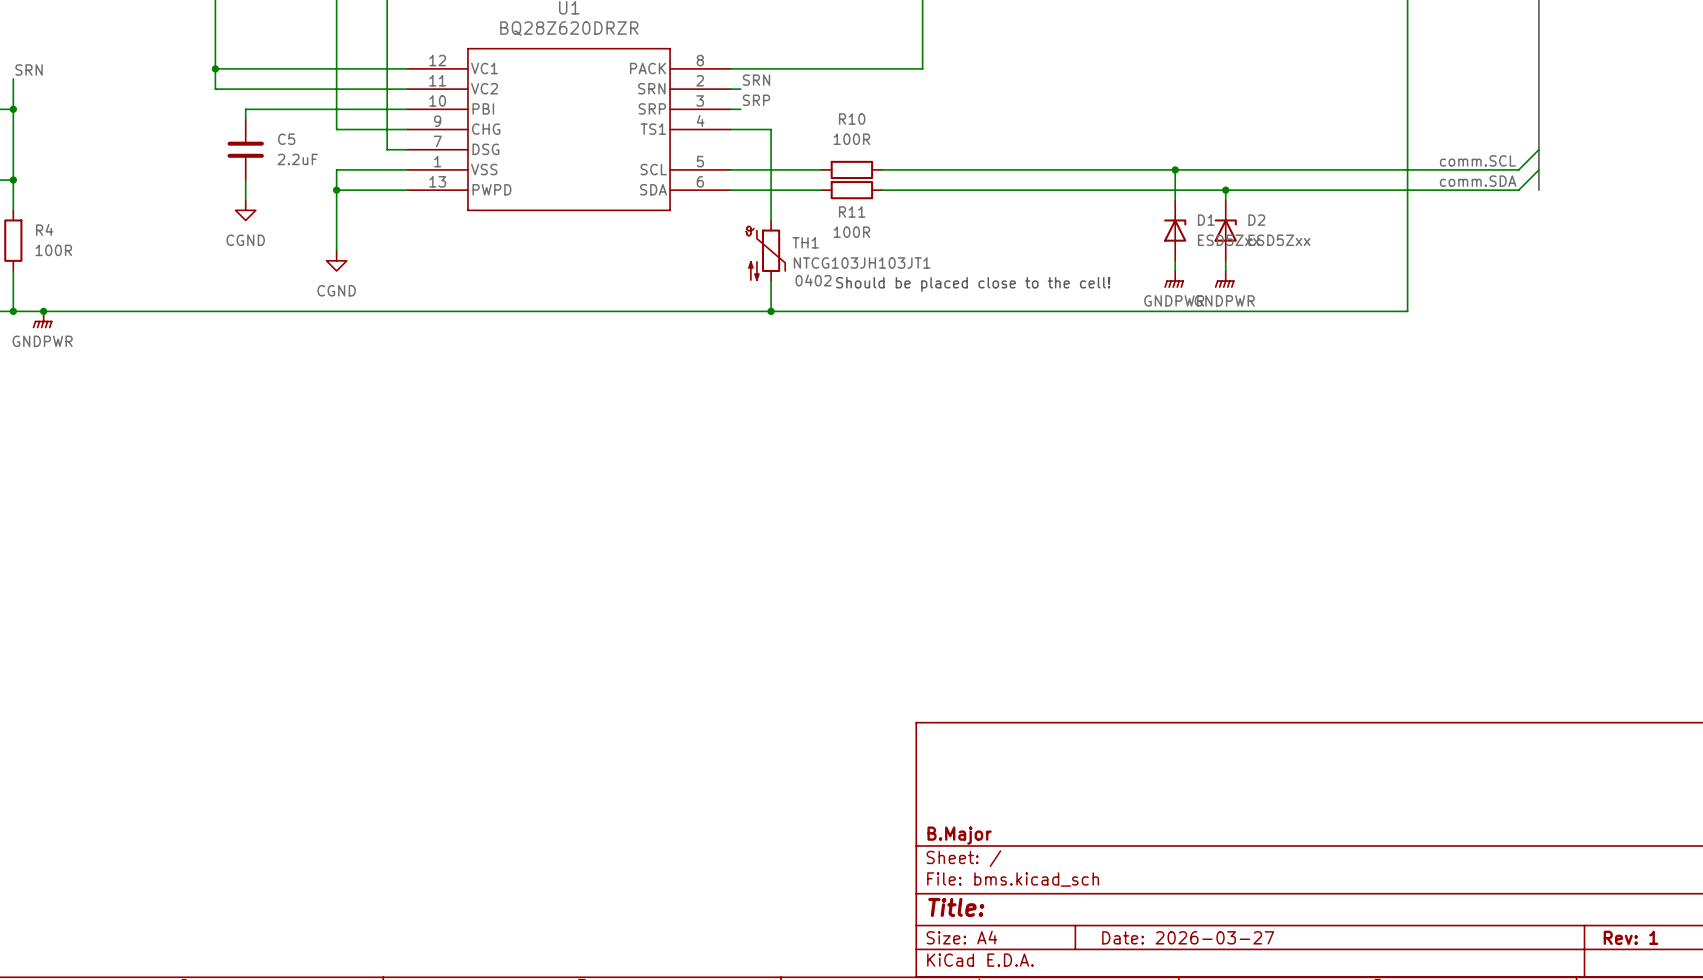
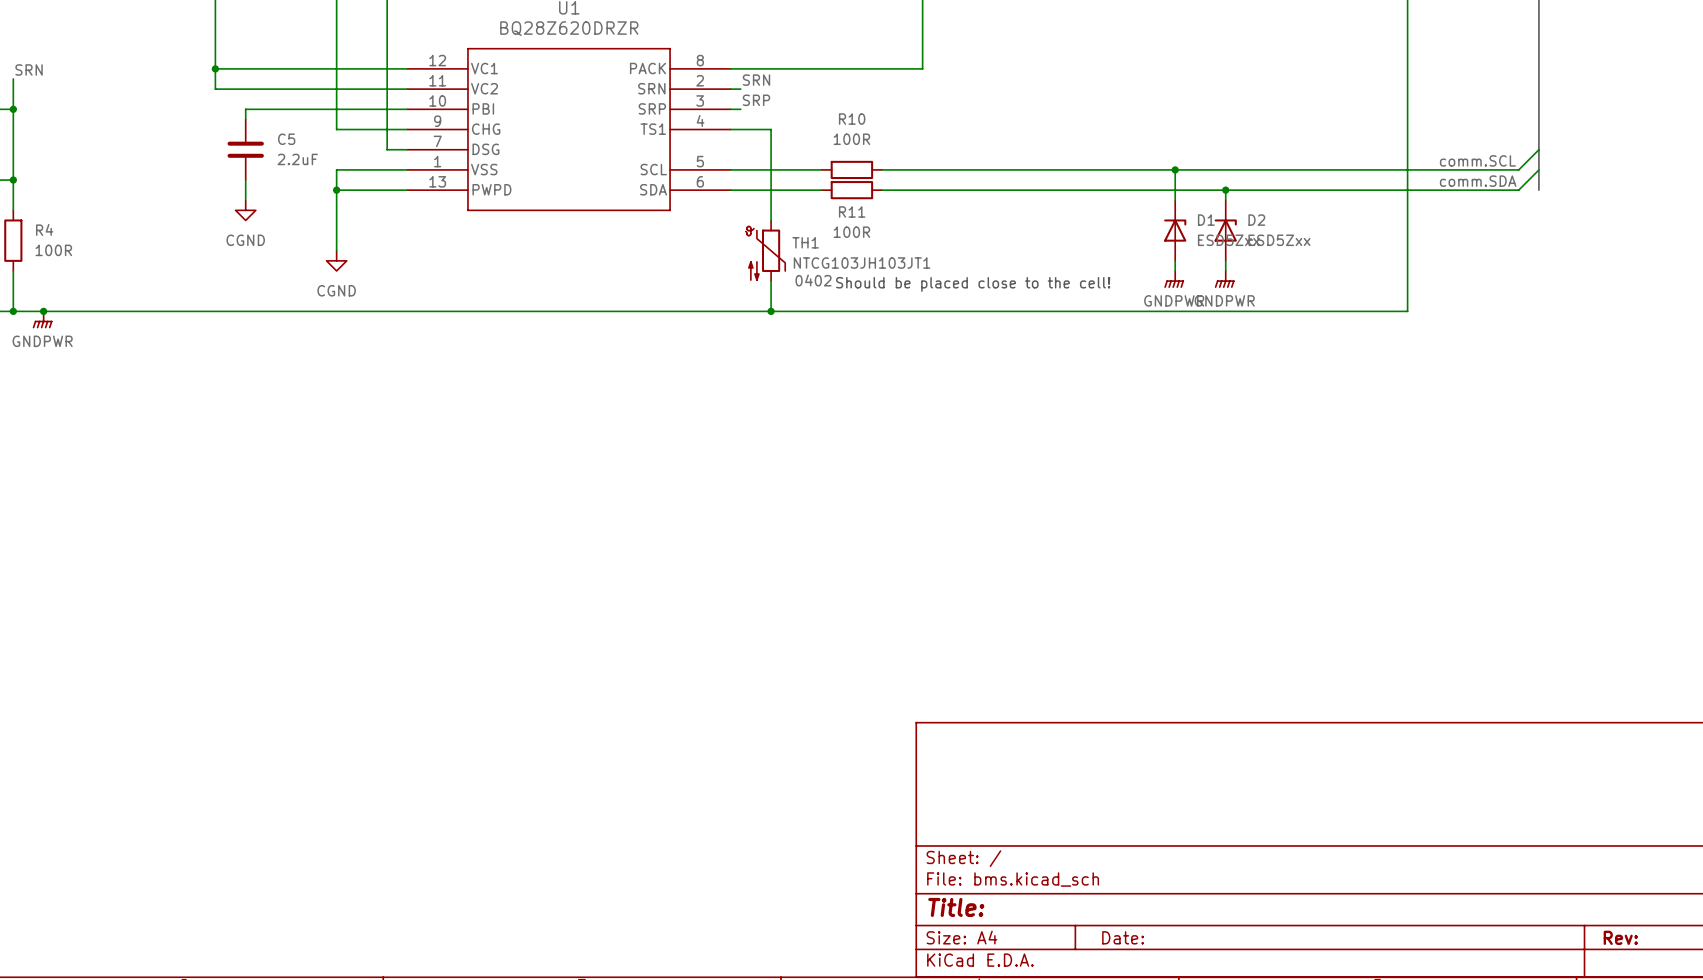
title block: B.Major (959, 835) -> none
title block: Date: 2026-03-27 (1188, 937) -> Date: (1123, 937)
title block: Rev: 1 (1630, 937) -> Rev: (1620, 937)

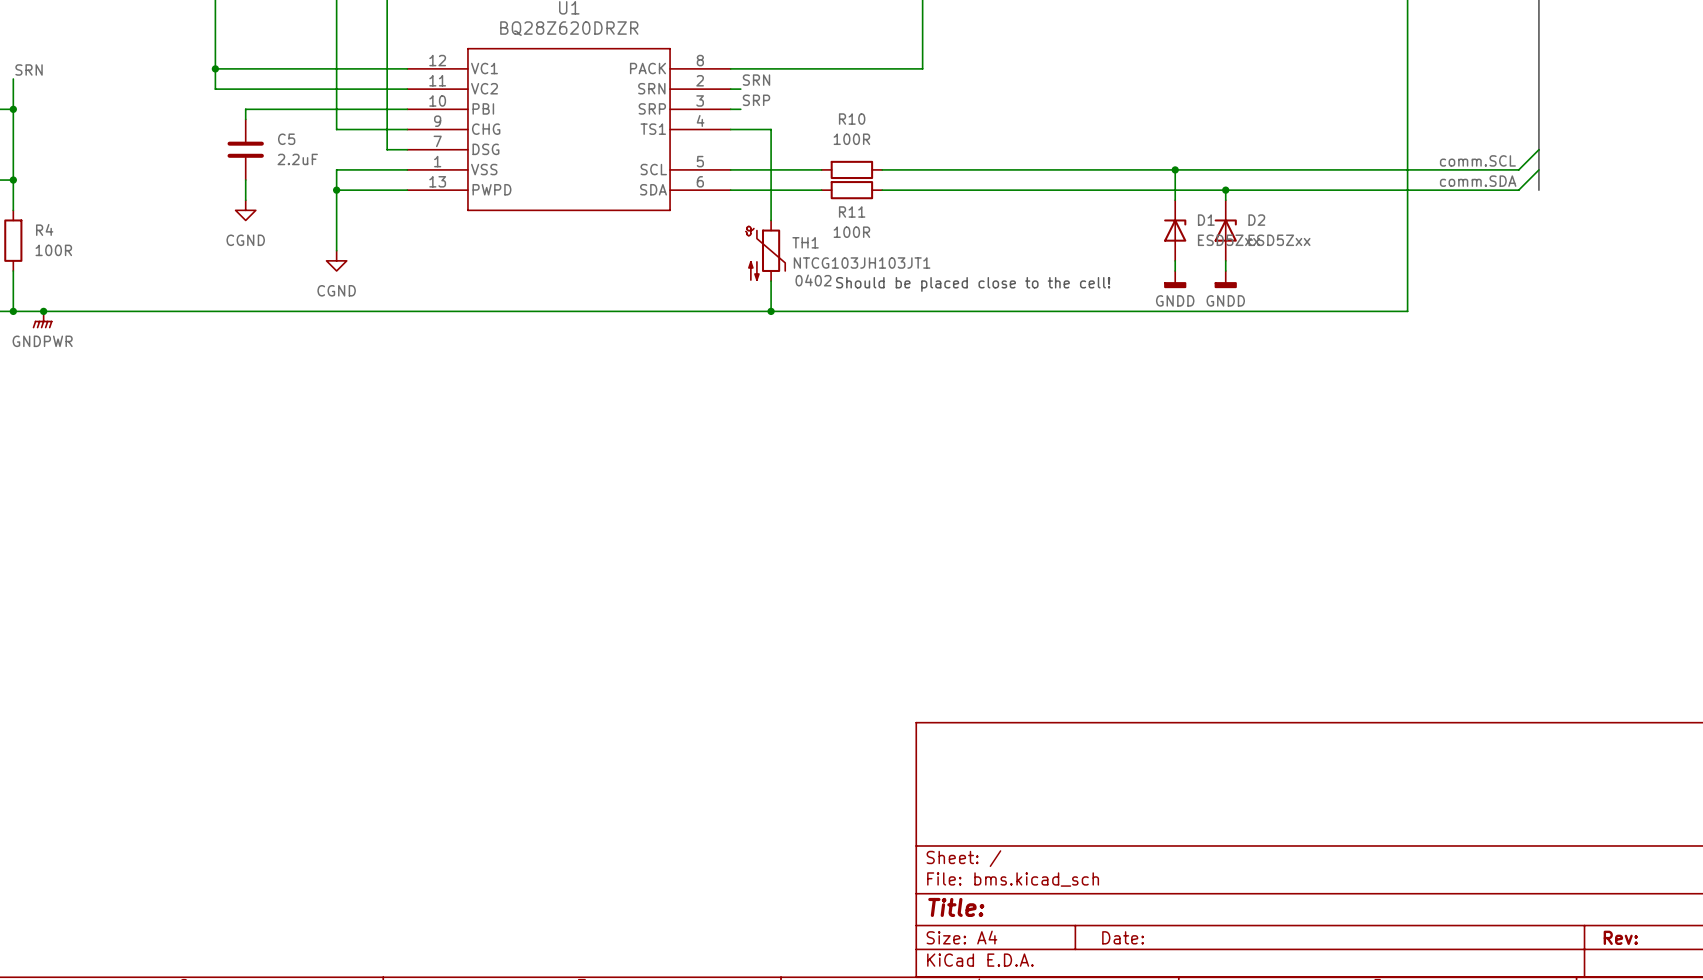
power symbol: GNDPWR (1174, 279) -> GNDD (1175, 279)
power symbol: GNDPWR (1224, 279) -> GNDD (1225, 279)

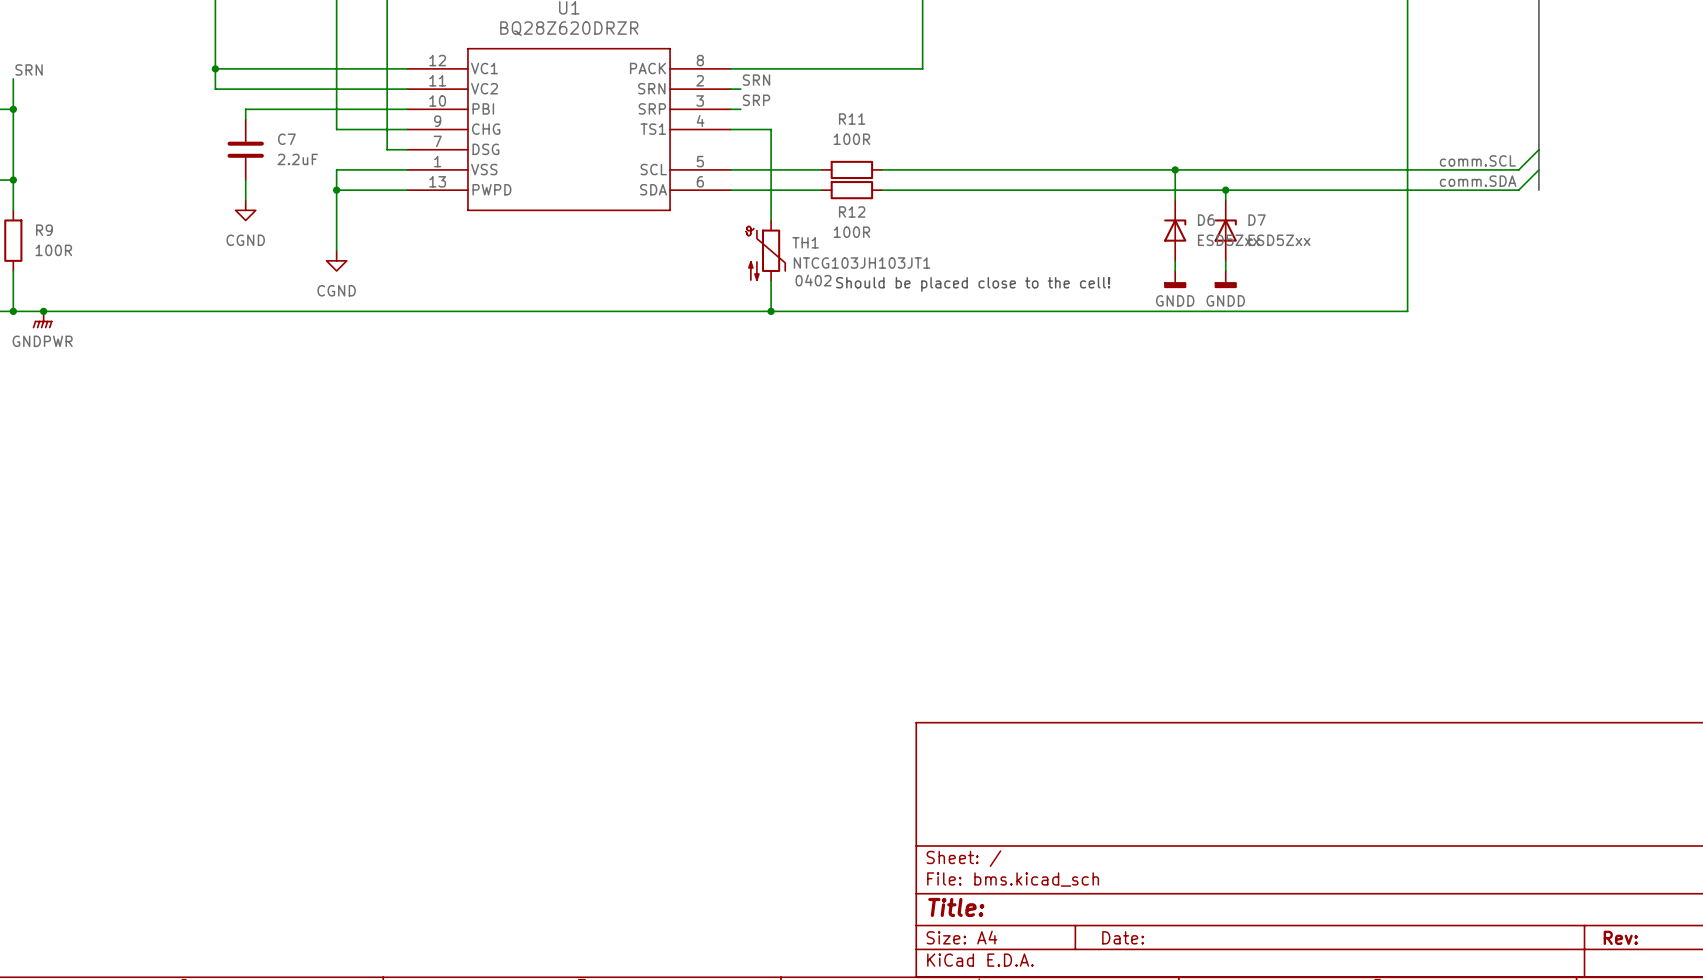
R10 name: R10 (852, 119) -> R11 (852, 119)
C5 name: C5 (286, 139) -> C7 (286, 139)
R11 name: R11 (852, 211) -> R12 (852, 211)
D1 name: D1 (1206, 220) -> D6 (1206, 220)
D2 name: D2 (1256, 220) -> D7 (1257, 220)
R4 name: R4 (44, 229) -> R9 (44, 230)

